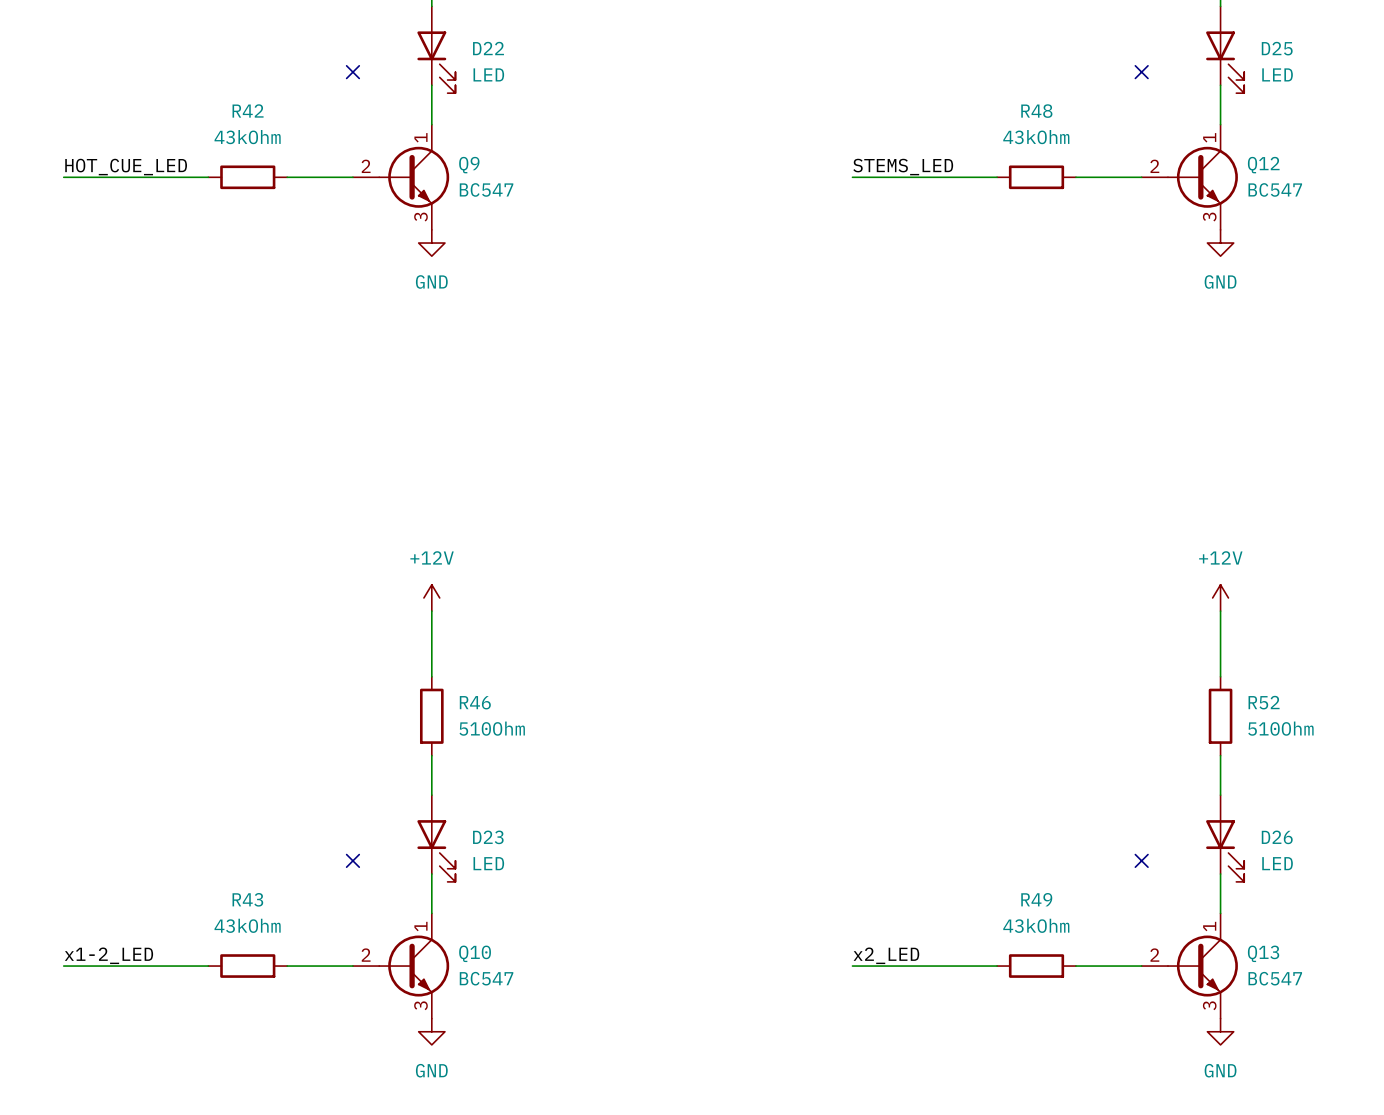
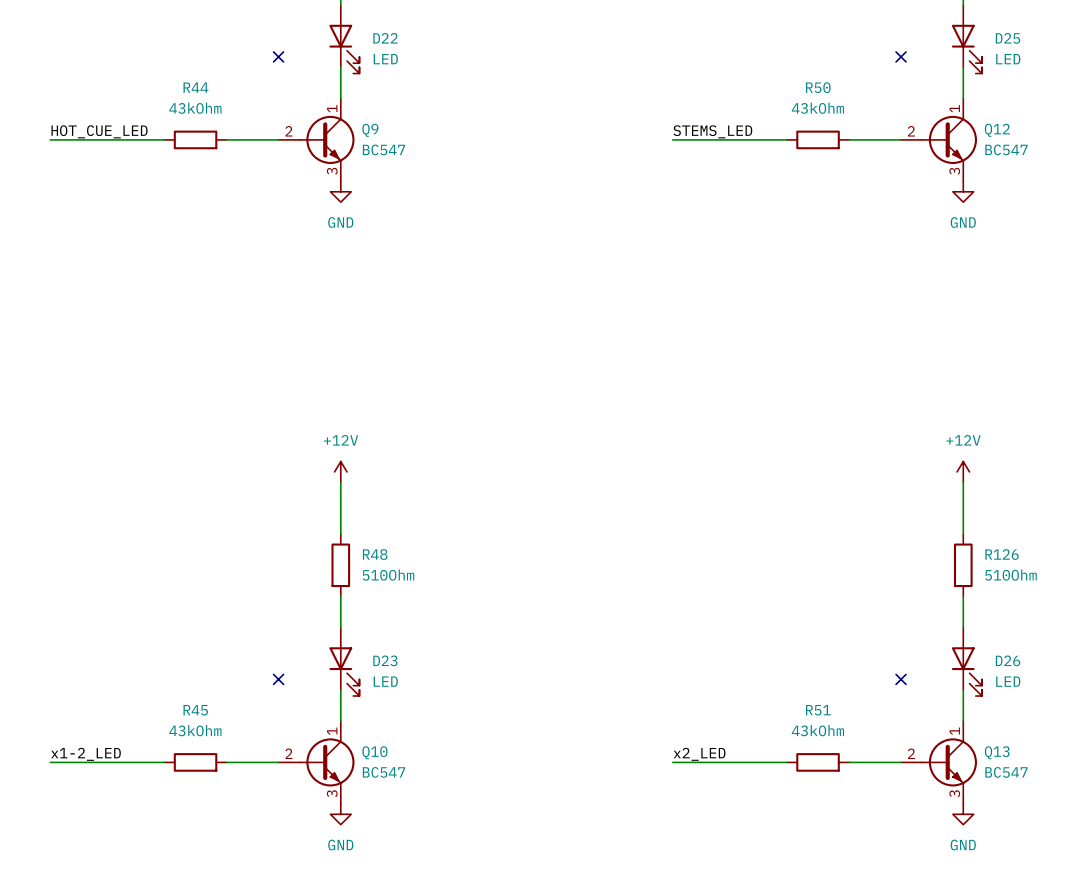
R42 name: R42 (248, 110) -> R44 (195, 87)
R48 name: R48 (1036, 111) -> R50 (818, 87)
R46 name: R46 (475, 702) -> R48 (375, 554)
R52 name: R52 (1264, 702) -> R126 (1002, 554)
R43 name: R43 (247, 899) -> R45 (195, 710)
R49 name: R49 (1036, 899) -> R51 (818, 710)

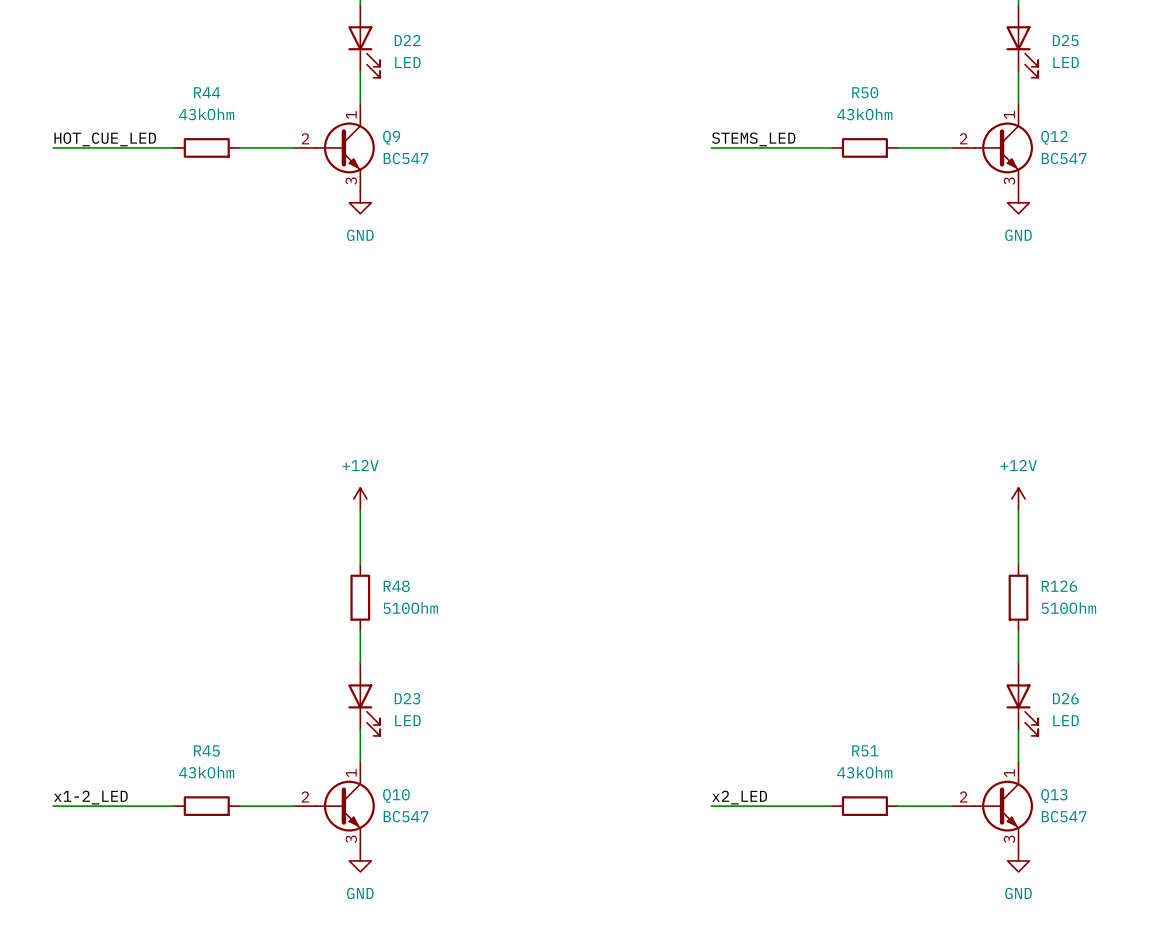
no-connect mark: (278, 56) -> none
no-connect mark: (901, 56) -> none
no-connect mark: (278, 679) -> none
no-connect mark: (901, 679) -> none

